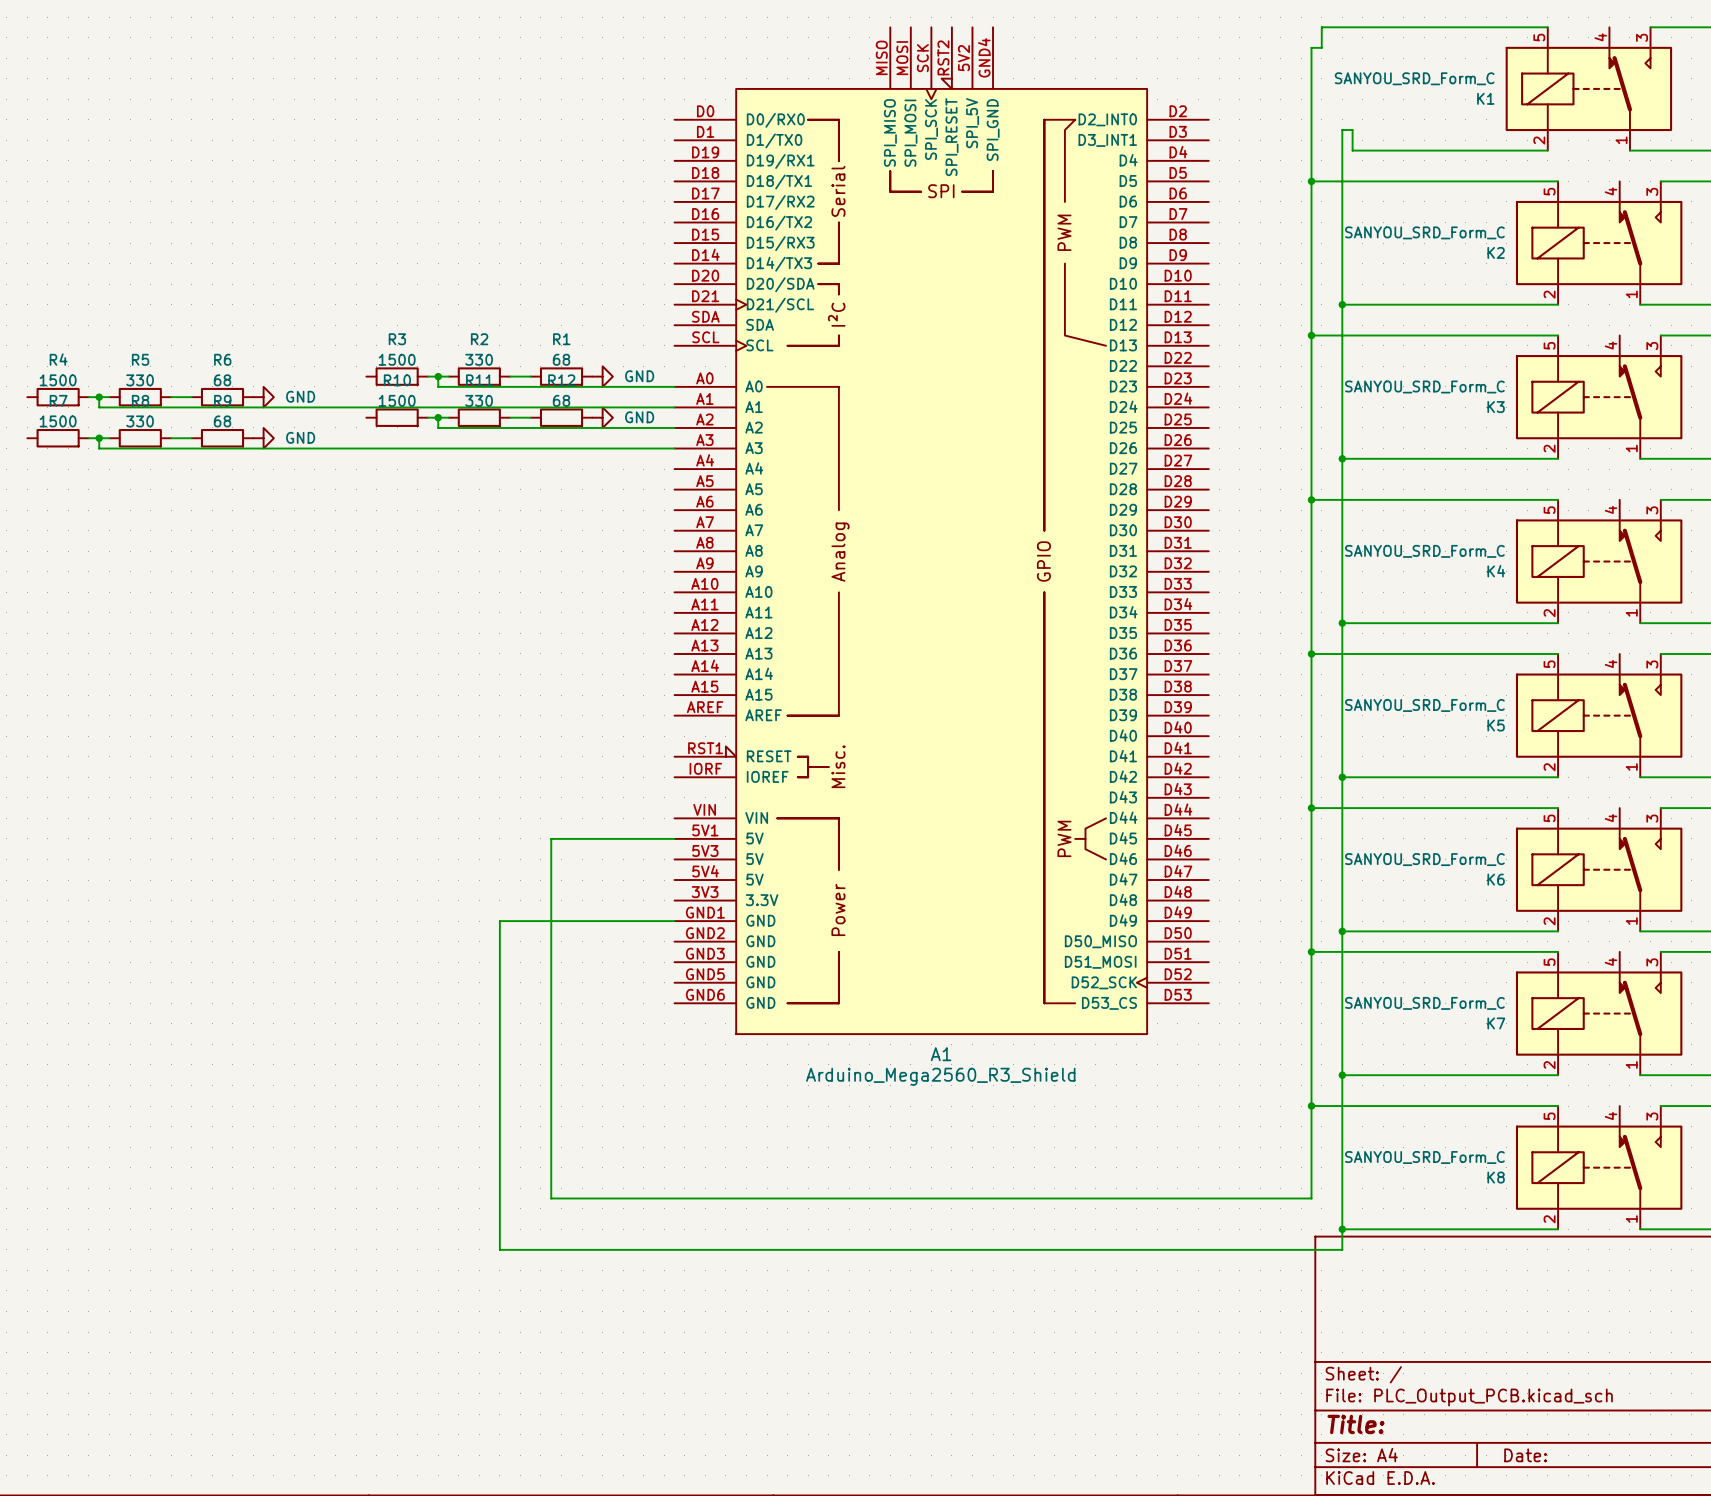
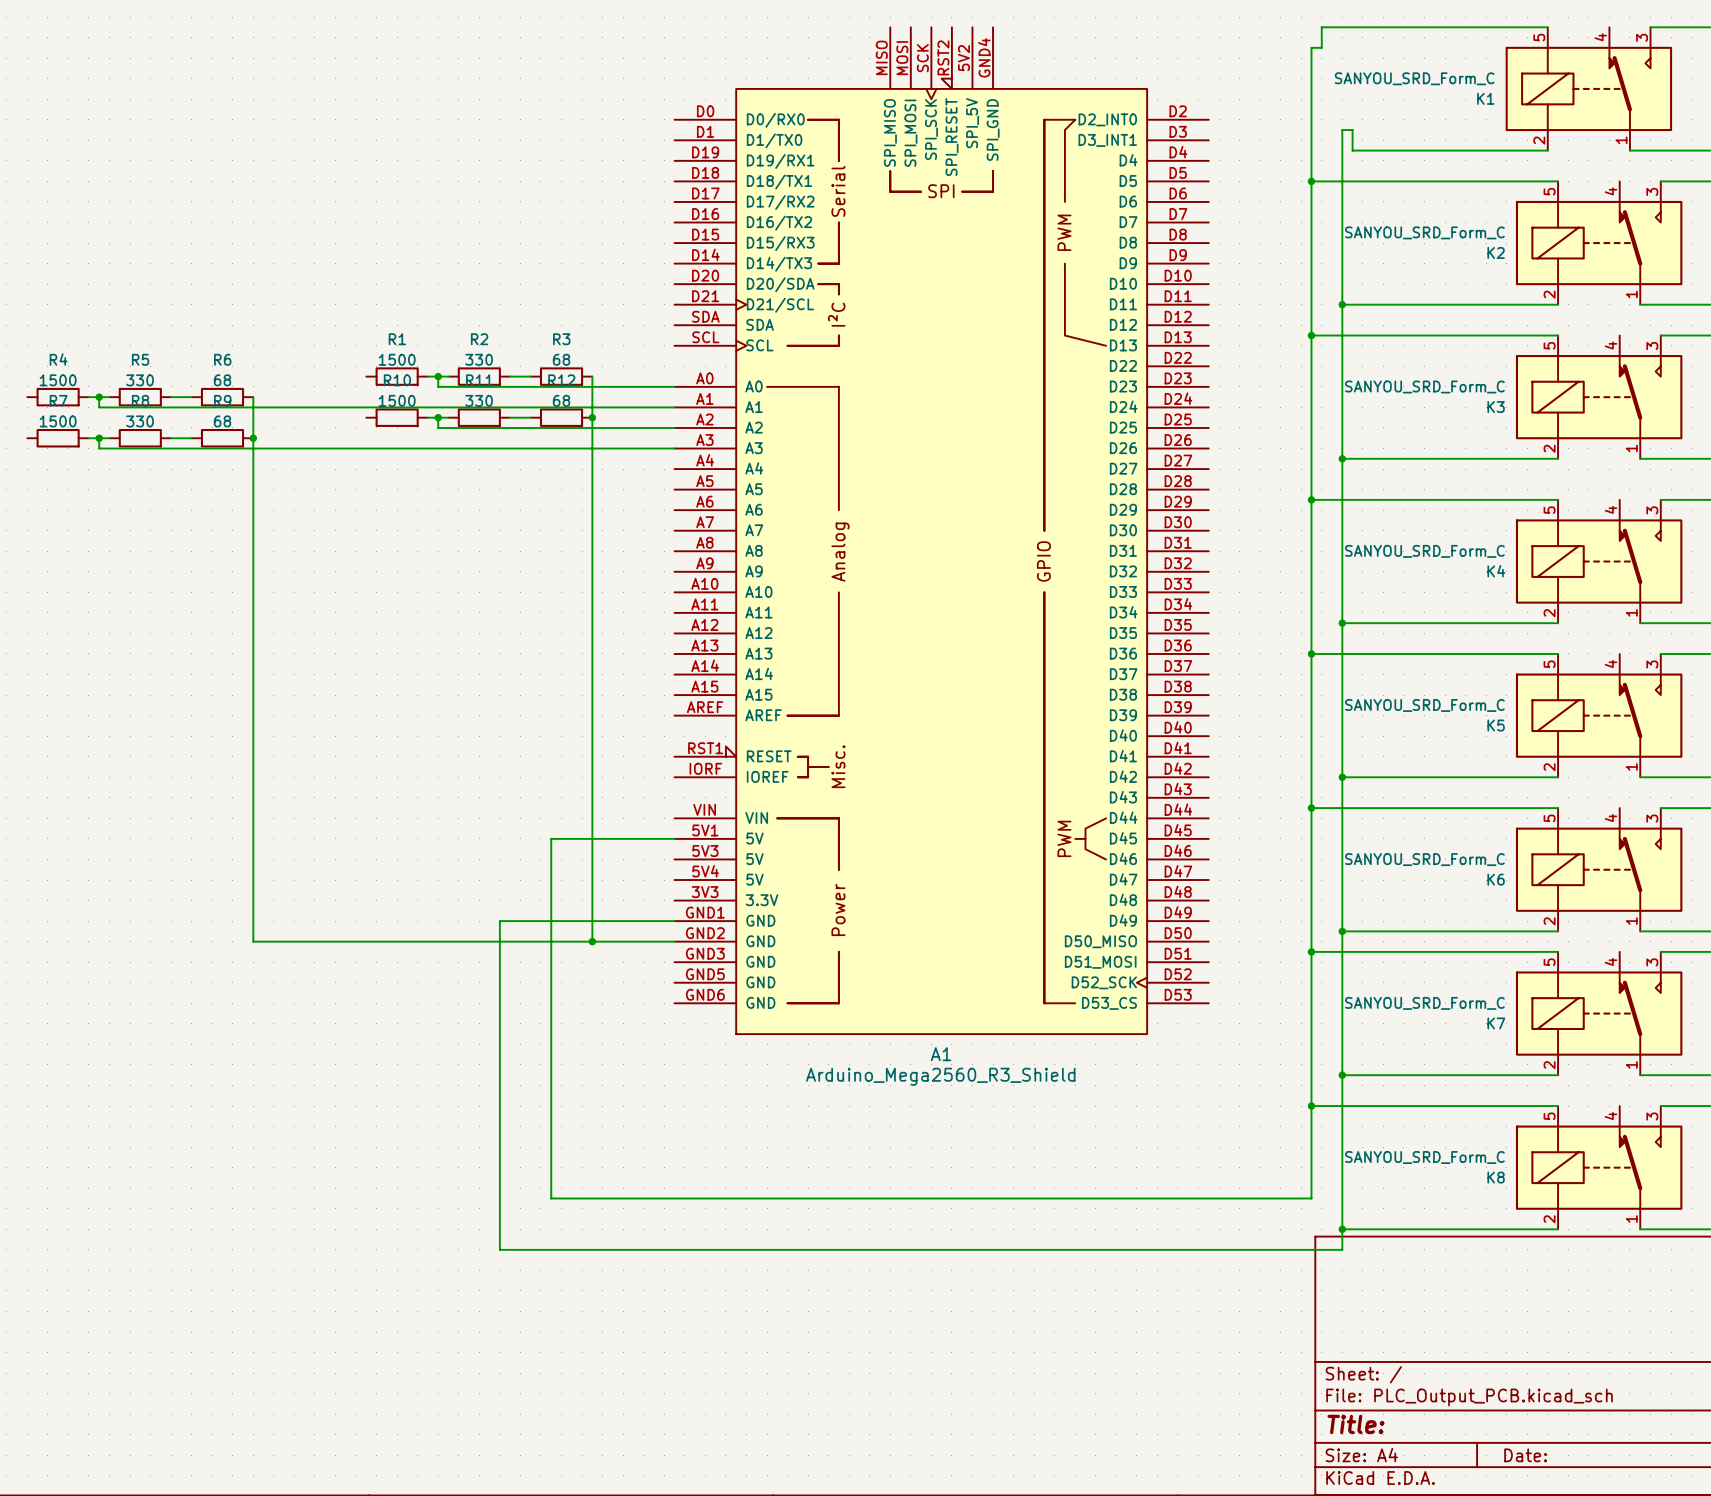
R3 name: R3 (397, 339) -> R1 (397, 339)
R1 name: R1 (561, 339) -> R3 (561, 339)
wire: none -> (592, 376) (592, 941)
power symbol: GND (602, 376) -> none
wire: none -> (253, 397) (253, 941) (674, 941)
power symbol: GND (263, 397) -> none
junction: none -> (592, 417)
power symbol: GND (602, 417) -> none
junction: none -> (253, 438)
power symbol: GND (263, 438) -> none
junction: none -> (592, 941)

